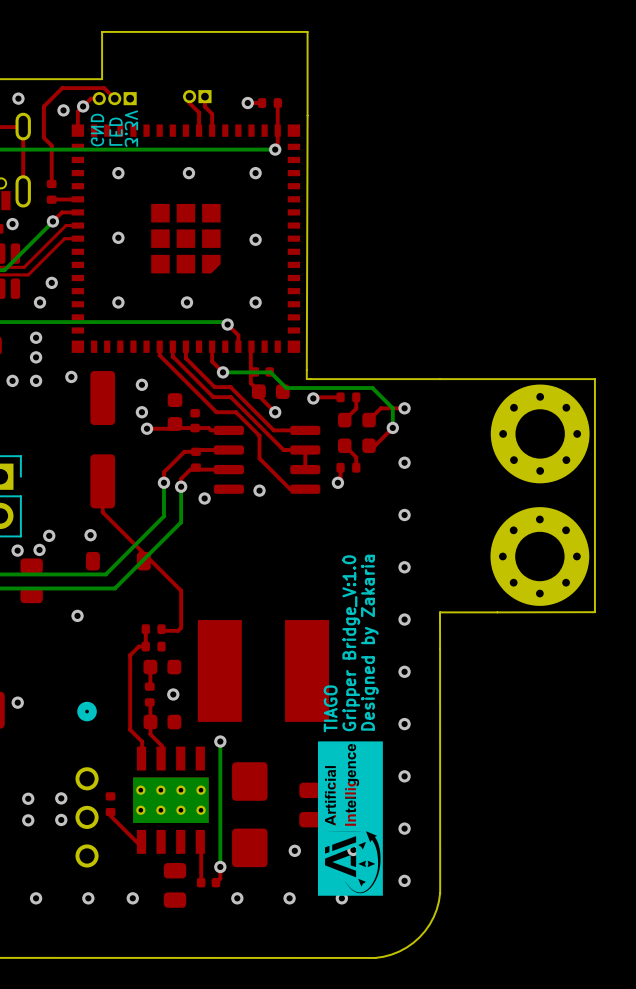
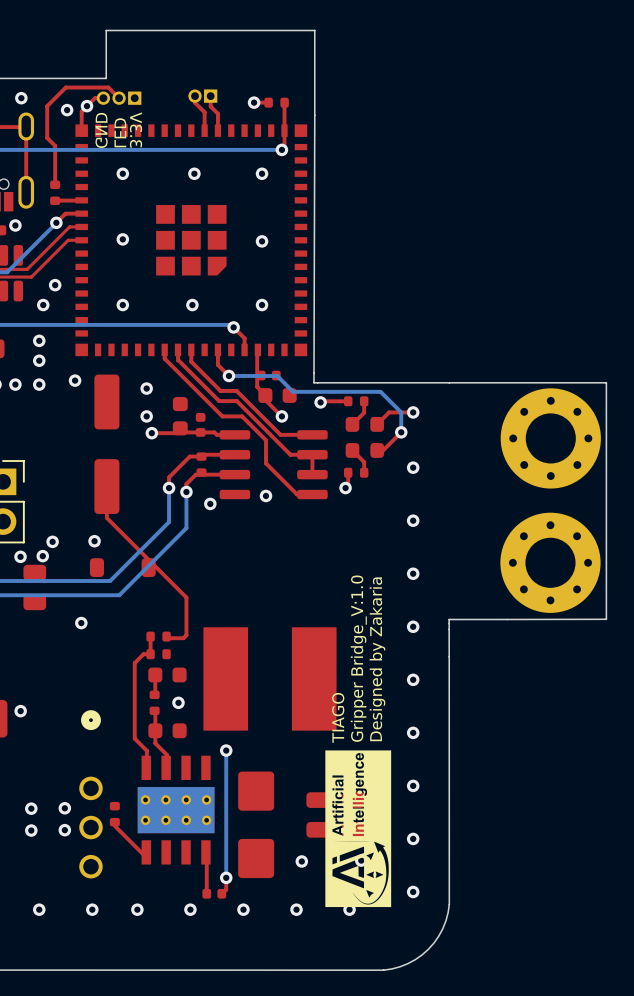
part: (175, 885) -> none
via: none -> (190, 909)

